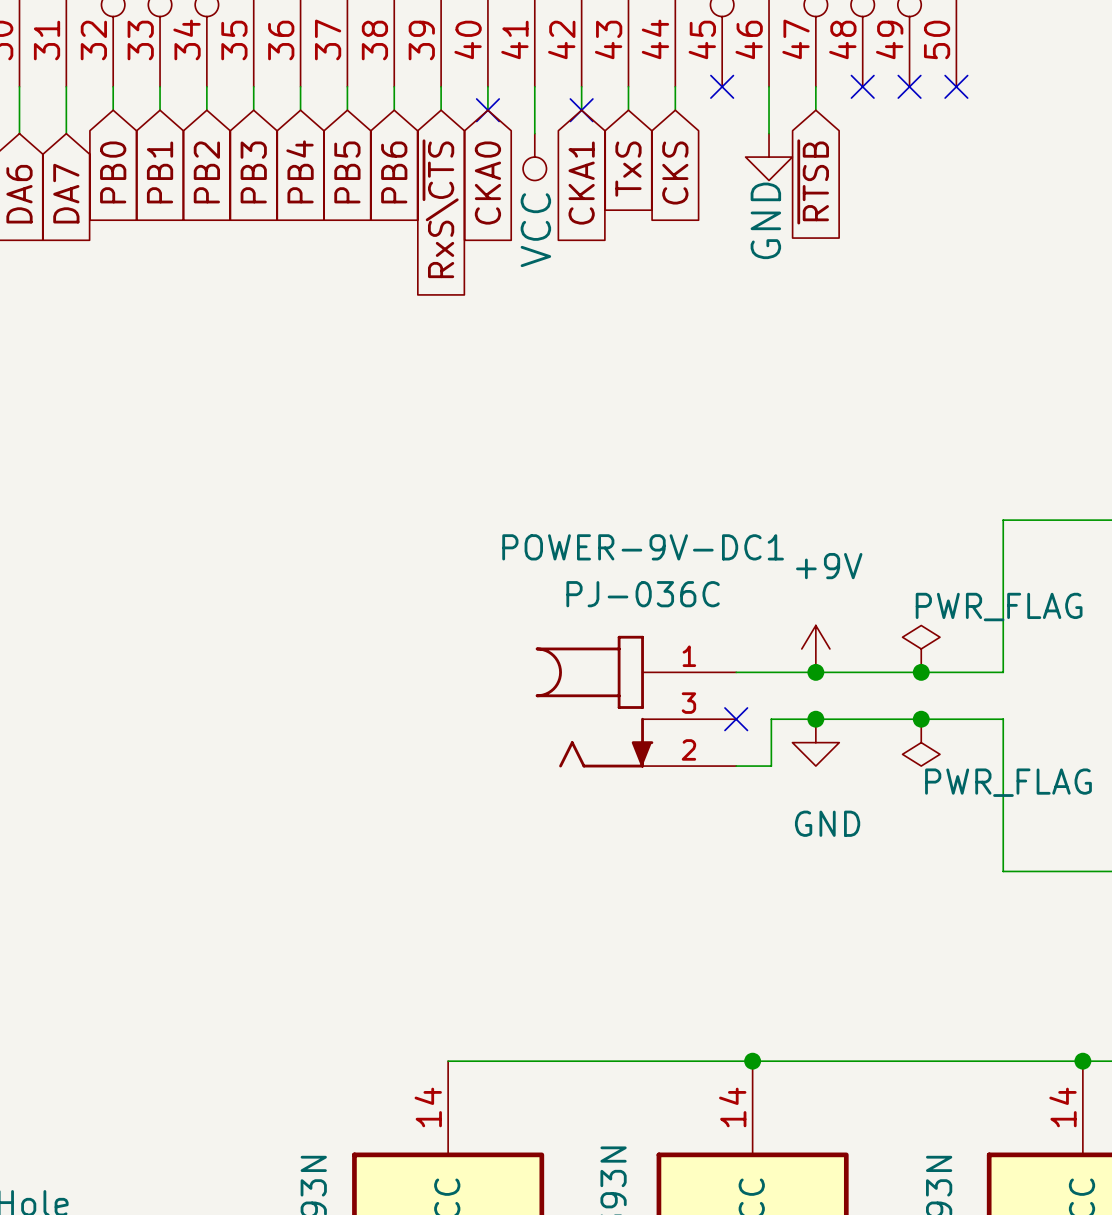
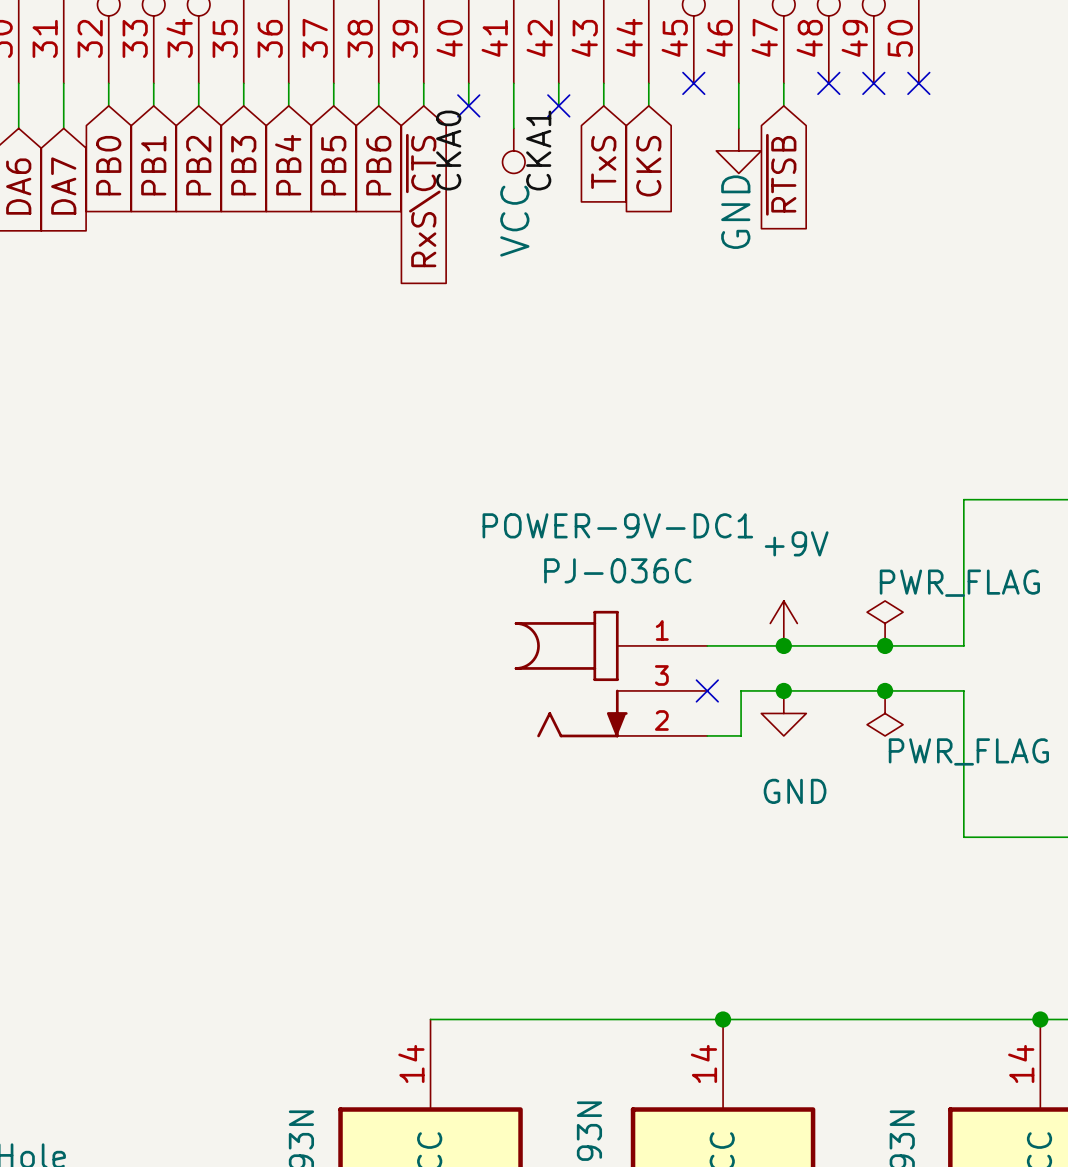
label: none -> CKA0 (448, 150)
label: none -> CKA1 (538, 150)
global label: CKA0 (487, 183) -> none
global label: CKA1 (581, 183) -> none

